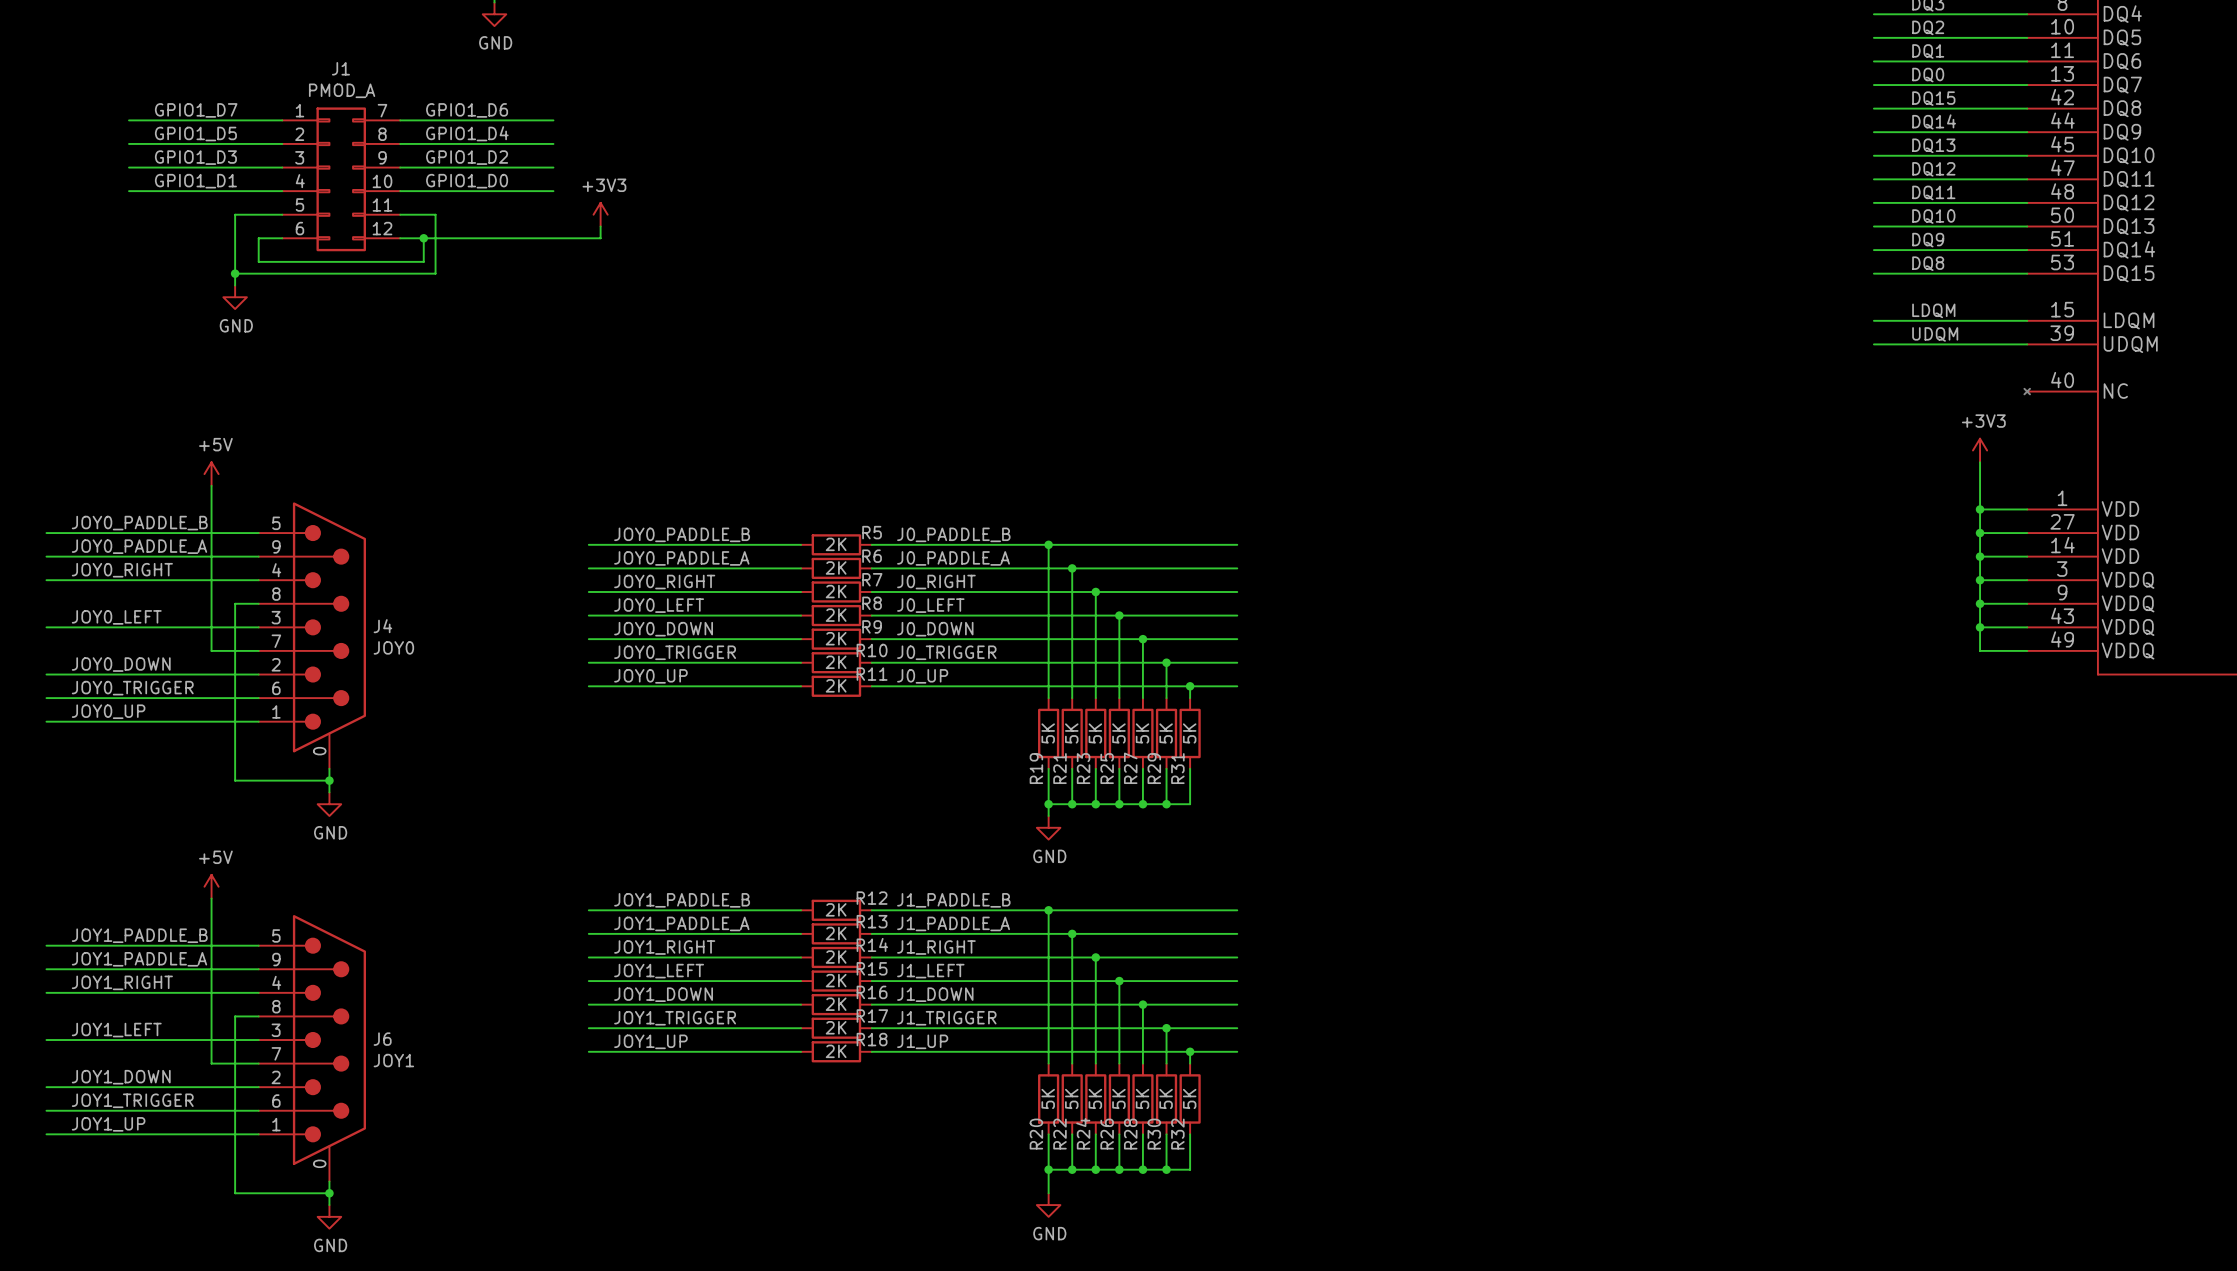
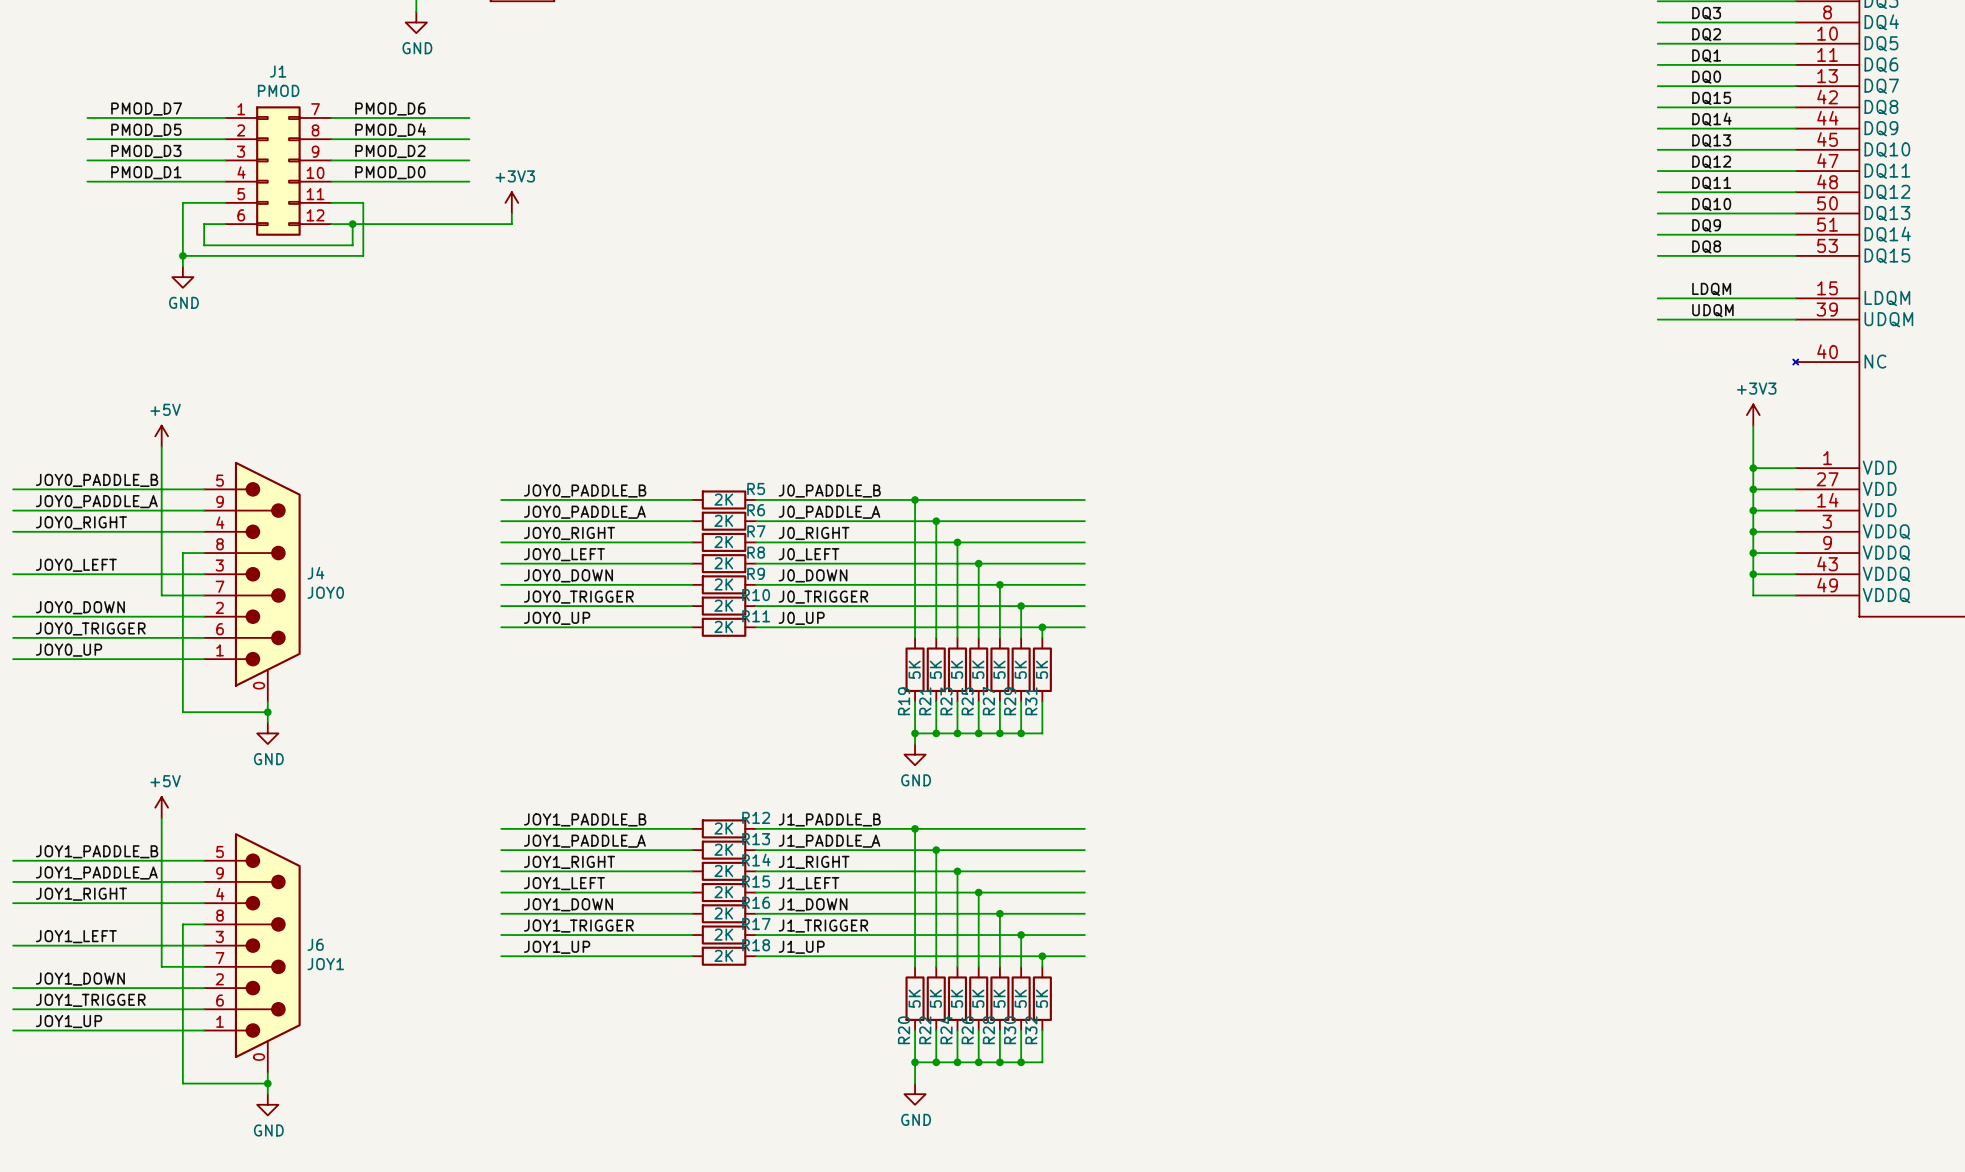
J1 value: PMOD_A (342, 90) -> PMOD (278, 90)
label: GPIO1_D7 (196, 110) -> PMOD_D7 (146, 109)
label: GPIO1_D6 (467, 110) -> PMOD_D6 (390, 109)
label: GPIO1_D4 (467, 133) -> PMOD_D4 (390, 130)
label: GPIO1_D5 (195, 134) -> PMOD_D5 (146, 130)
label: GPIO1_D3 (195, 157) -> PMOD_D3 (146, 151)
label: GPIO1_D2 (467, 157) -> PMOD_D2 (390, 151)
label: GPIO1_D1 (195, 181) -> PMOD_D1 (146, 172)
label: GPIO1_D0 (467, 181) -> PMOD_D0 (390, 172)

